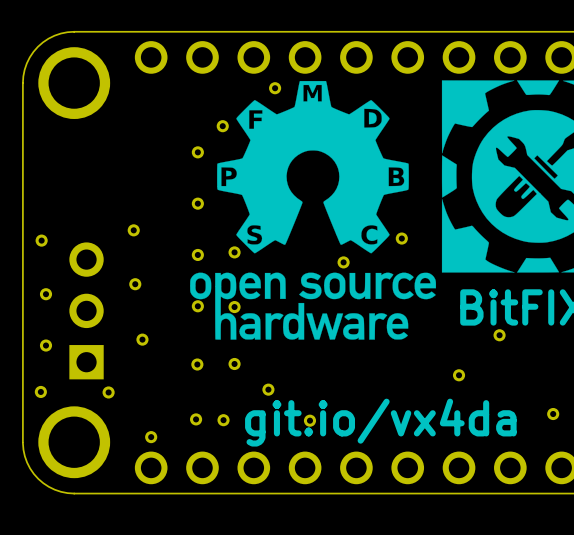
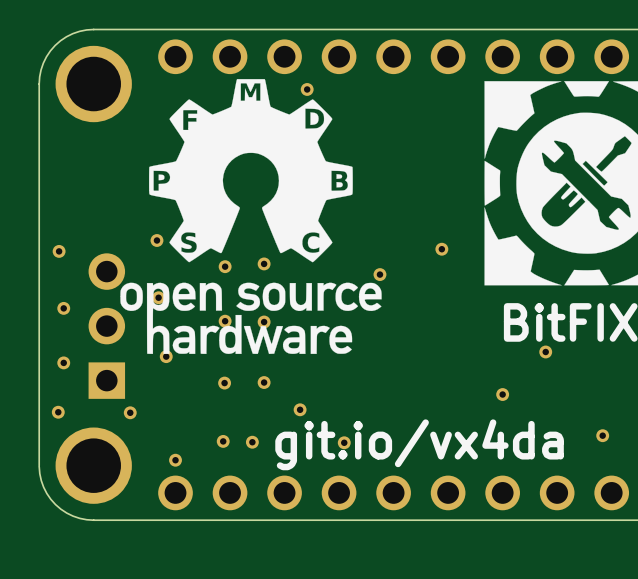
drawing position: (313, 210) -> (251, 216)

